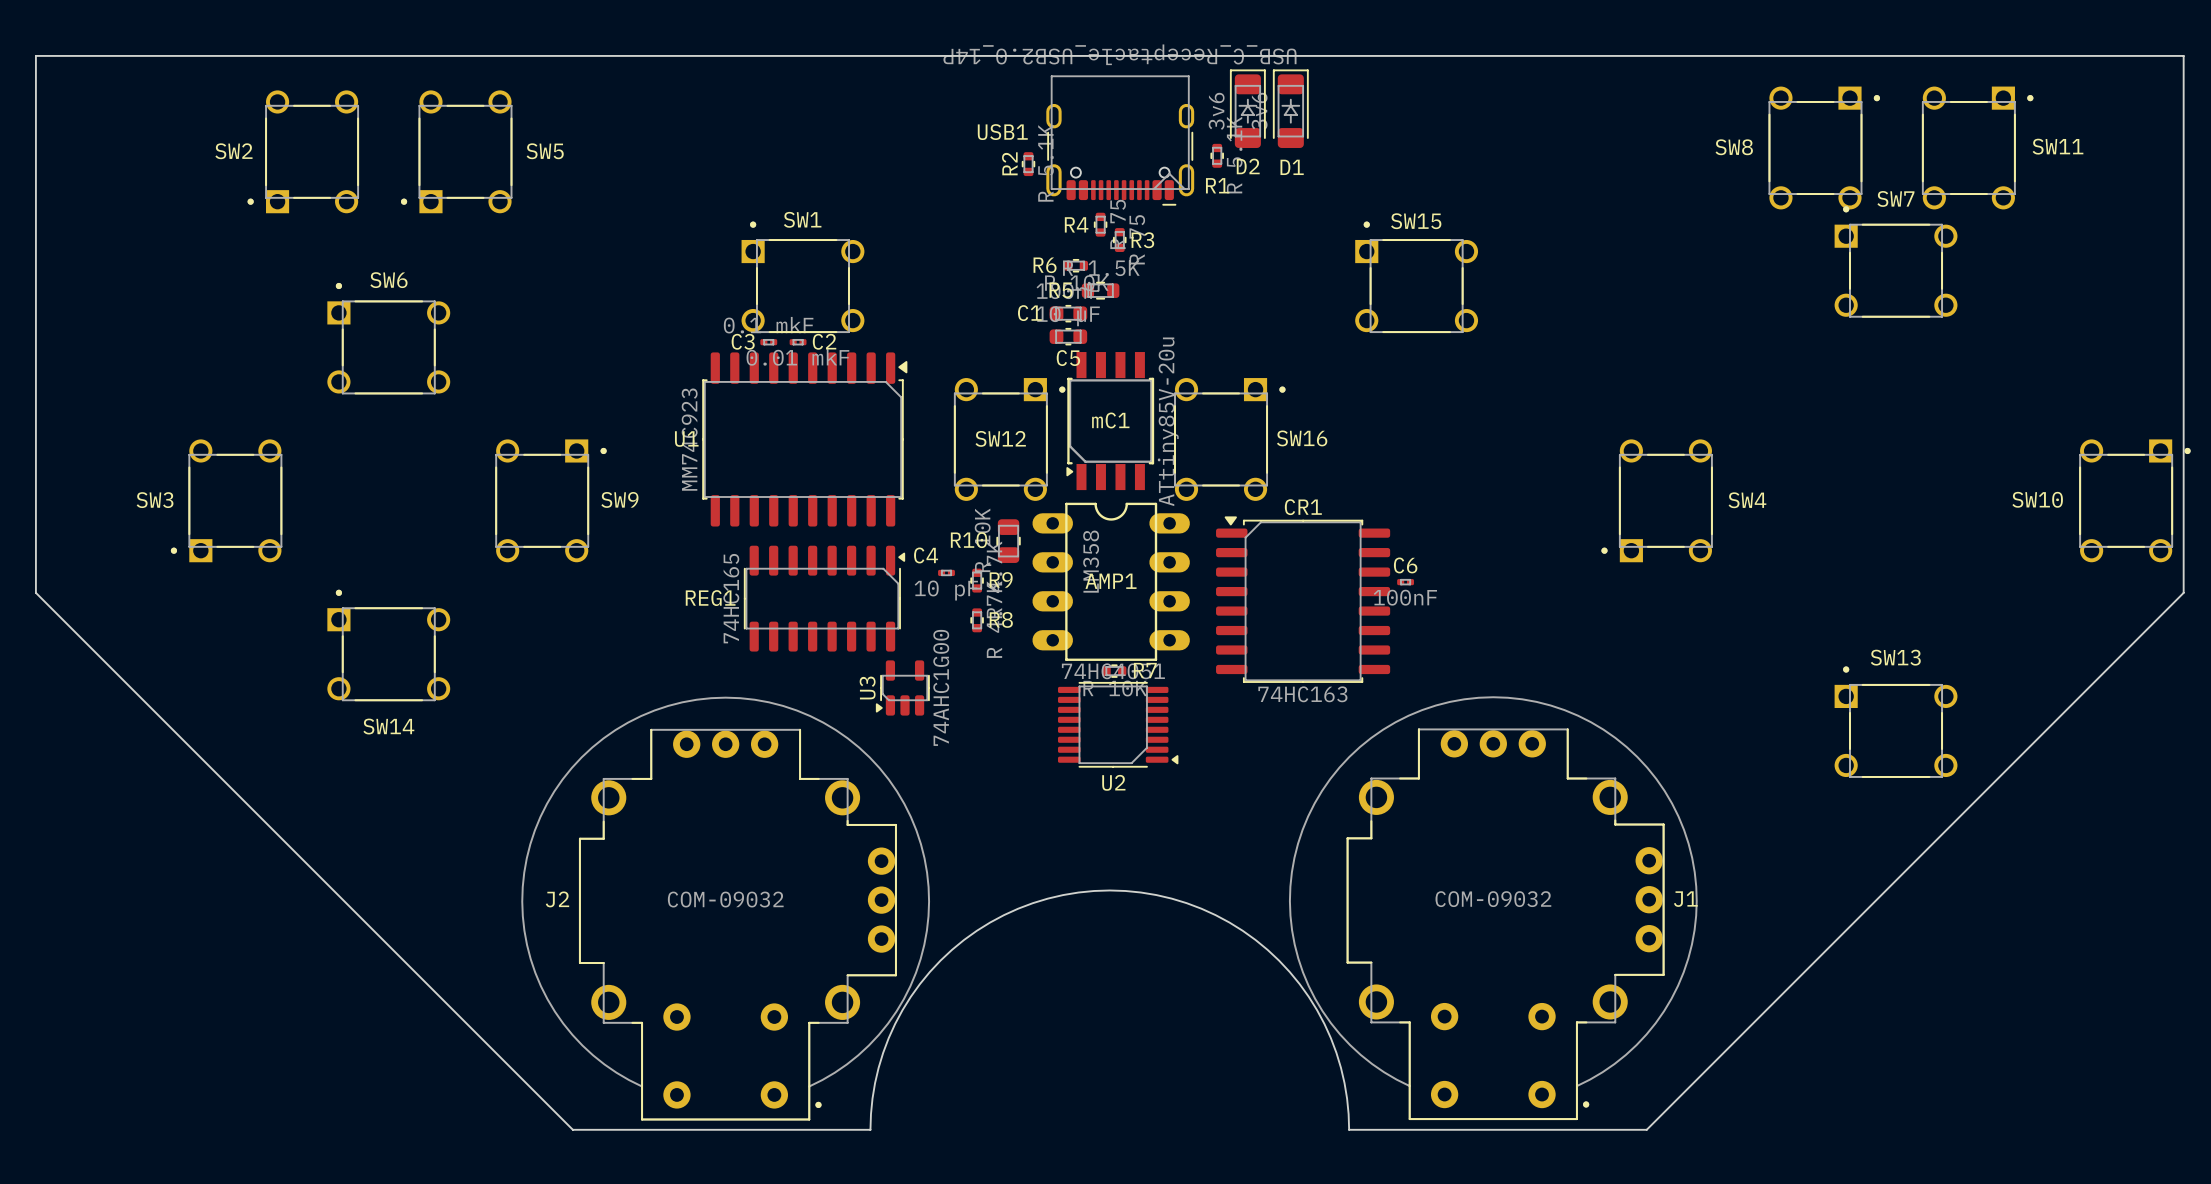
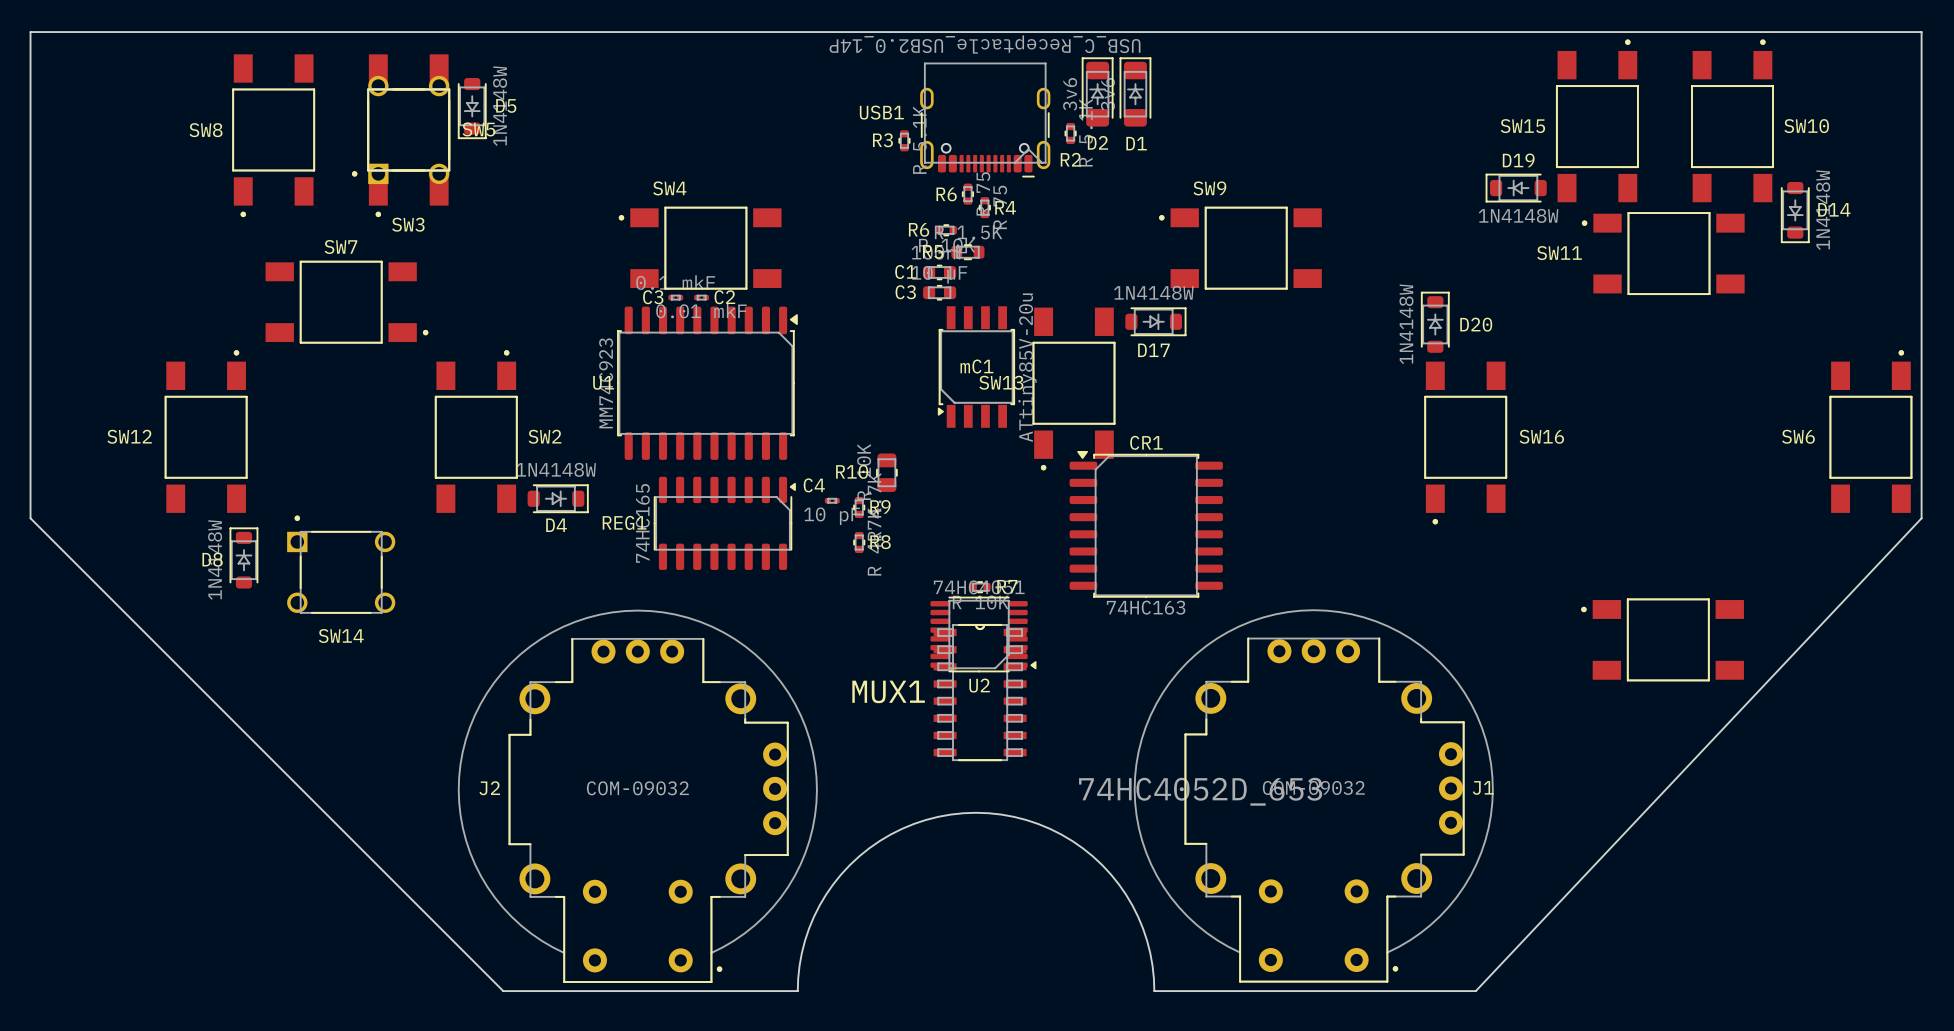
board edge: (35, 55) (2183, 55) -> (30, 45) (30, 32) (1921, 32) (1921, 45)
SW8 footprint: [1768, 86, 1880, 210] -> [232, 54, 316, 218]
SW11 footprint: [1921, 86, 2034, 210] -> [1581, 212, 1745, 295]
SW2 footprint: [247, 90, 360, 214] -> [434, 350, 518, 513]
D5: none -> 1N4148W (472, 108)
SW11 name position: SW11 (2058, 146) -> SW11 (1559, 253)
SW2 name position: SW2 (233, 151) -> SW2 (544, 436)
R2 name: R2 (1009, 163) -> R3 (882, 140)
R1 name: R1 (1217, 185) -> R2 (1070, 159)
SW7 footprint: [1834, 206, 1958, 318] -> [265, 260, 429, 344]
D19: none -> 1N4148W (1516, 188)
SW15 footprint: [1355, 221, 1479, 334] -> [1556, 39, 1639, 203]
SW15 name position: SW15 (1416, 221) -> SW15 (1522, 126)
R4 name: R4 (1076, 224) -> R6 (946, 194)
R3 name: R3 (1142, 240) -> R4 (1005, 207)
D14: none -> 1N4148W (1795, 212)
SW1: (802, 277) -> none
SW6 name position: SW6 (388, 280) -> SW6 (1798, 436)
SW6 footprint: [327, 282, 451, 395] -> [1829, 350, 1913, 513]
C5 name: C5 (1068, 358) -> C3 (905, 292)
D17: none -> 1N4148W (1155, 321)
D20: none -> 1N4148W (1435, 322)
SW12 footprint: [953, 378, 1066, 501] -> [164, 350, 248, 513]
SW16 footprint: [1174, 378, 1286, 501] -> [1424, 361, 1508, 525]
SW12 name position: SW12 (1000, 438) -> SW12 (129, 436)
SW3 footprint: [170, 439, 283, 563] -> [367, 54, 451, 218]
SW9 footprint: [495, 439, 607, 563] -> [1159, 206, 1322, 290]
SW4 footprint: [1601, 439, 1713, 563] -> [618, 206, 782, 290]
SW10 footprint: [2079, 439, 2191, 563] -> [1691, 39, 1774, 203]
SW9 name position: SW9 (619, 499) -> SW9 (1209, 188)
SW10 name position: SW10 (2037, 499) -> SW10 (1806, 126)
SW3 name position: SW3 (155, 500) -> SW3 (408, 224)
SW4 name position: SW4 (1747, 500) -> SW4 (669, 188)
D4: none -> 1N4148W (558, 498)
AMP1: LM358 (1111, 581) -> none
C6: 100nF (1405, 582) -> none
board edge: (2183, 592) (1646, 1129) -> (1921, 518) (1475, 991) (1448, 991)
D8: none -> 1N4148W (243, 558)
SW13 name position: SW13 (1895, 657) -> SW13 (1001, 382)
SW13 footprint: [1834, 666, 1958, 778] -> [1032, 307, 1116, 471]
U3: 74AHC1G00 (902, 687) -> none
part: none -> (1662, 639)
MUX1: none -> 74HC4052D_653 (980, 692)
board edge: (870, 1129) (875, 1083) (888, 1038) (910, 996) (940, 960) (976, 930) (1018, 908) (1063, 895) (1109, 890) (1156, 895) (1201, 908) (1242, 930) (1279, 960) (1308, 996) (1330, 1038) (1344, 1083) (1349, 1129) -> (765, 991) (797, 991) (801, 953) (813, 917) (833, 884) (859, 856) (879, 841) (913, 824) (950, 814) (976, 812) (1001, 814) (1038, 824) (1072, 841) (1092, 856) (1118, 884) (1138, 917) (1150, 953) (1154, 991) (1186, 991)

